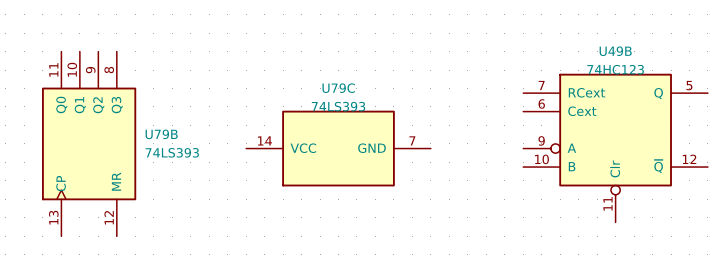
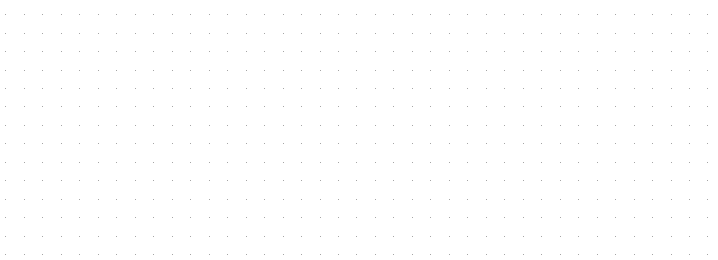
U79B: 74LS393 (89, 143) -> none
U79C: 74LS393 (338, 148) -> none
U49B: 74HC123 (615, 148) -> none

